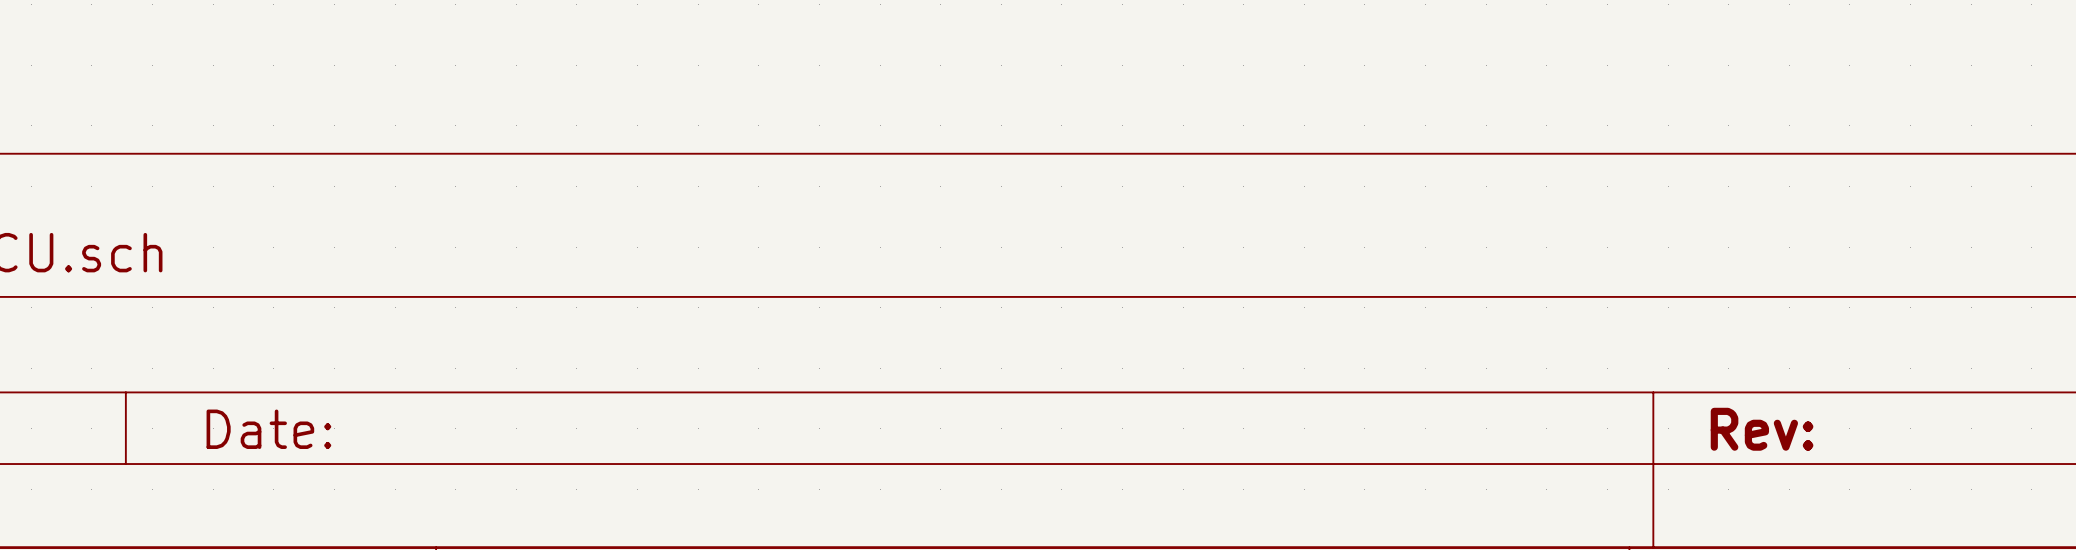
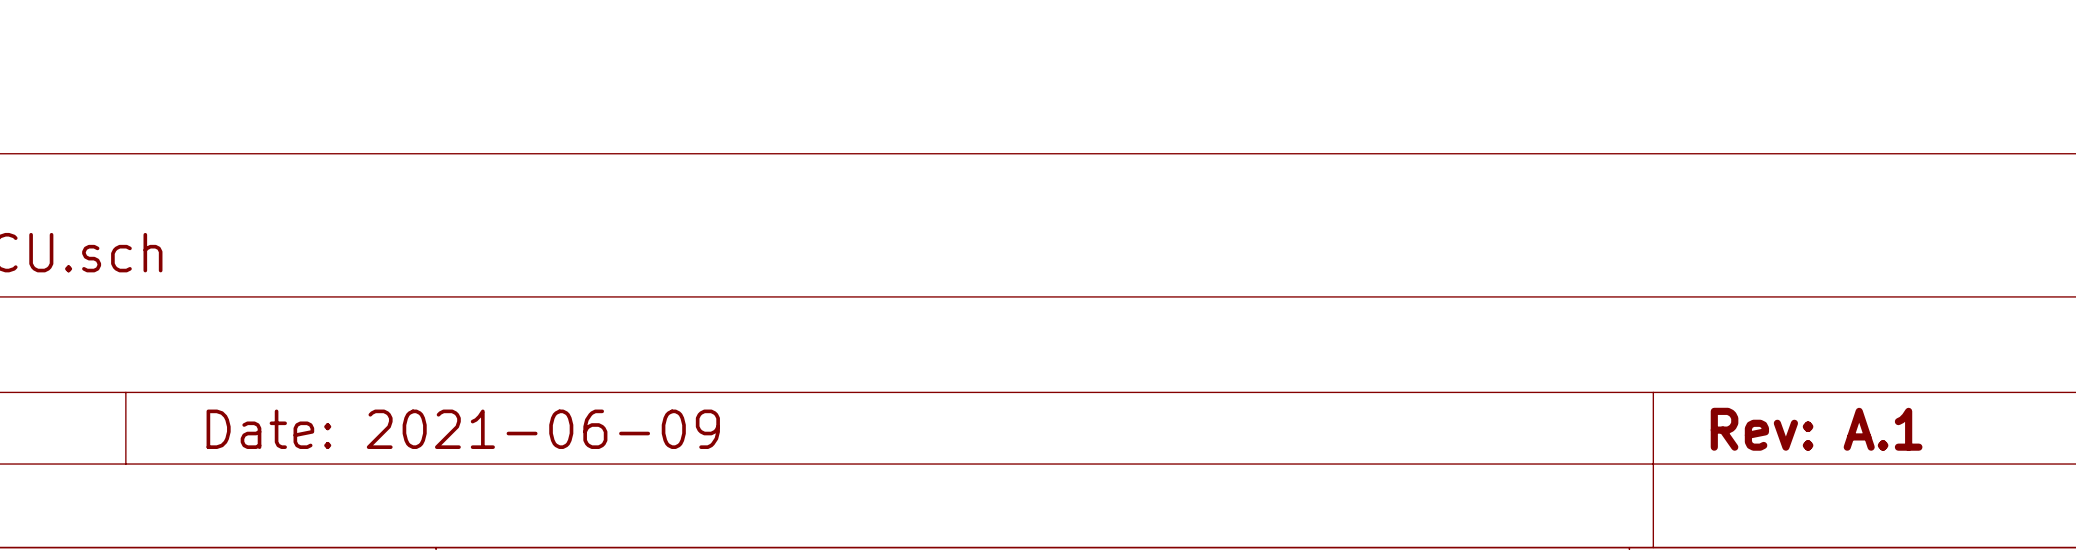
title block: Date: (268, 429) -> Date: 2021-06-09 (463, 429)
title block: Rev: (1762, 429) -> Rev: A.1 (1816, 429)

